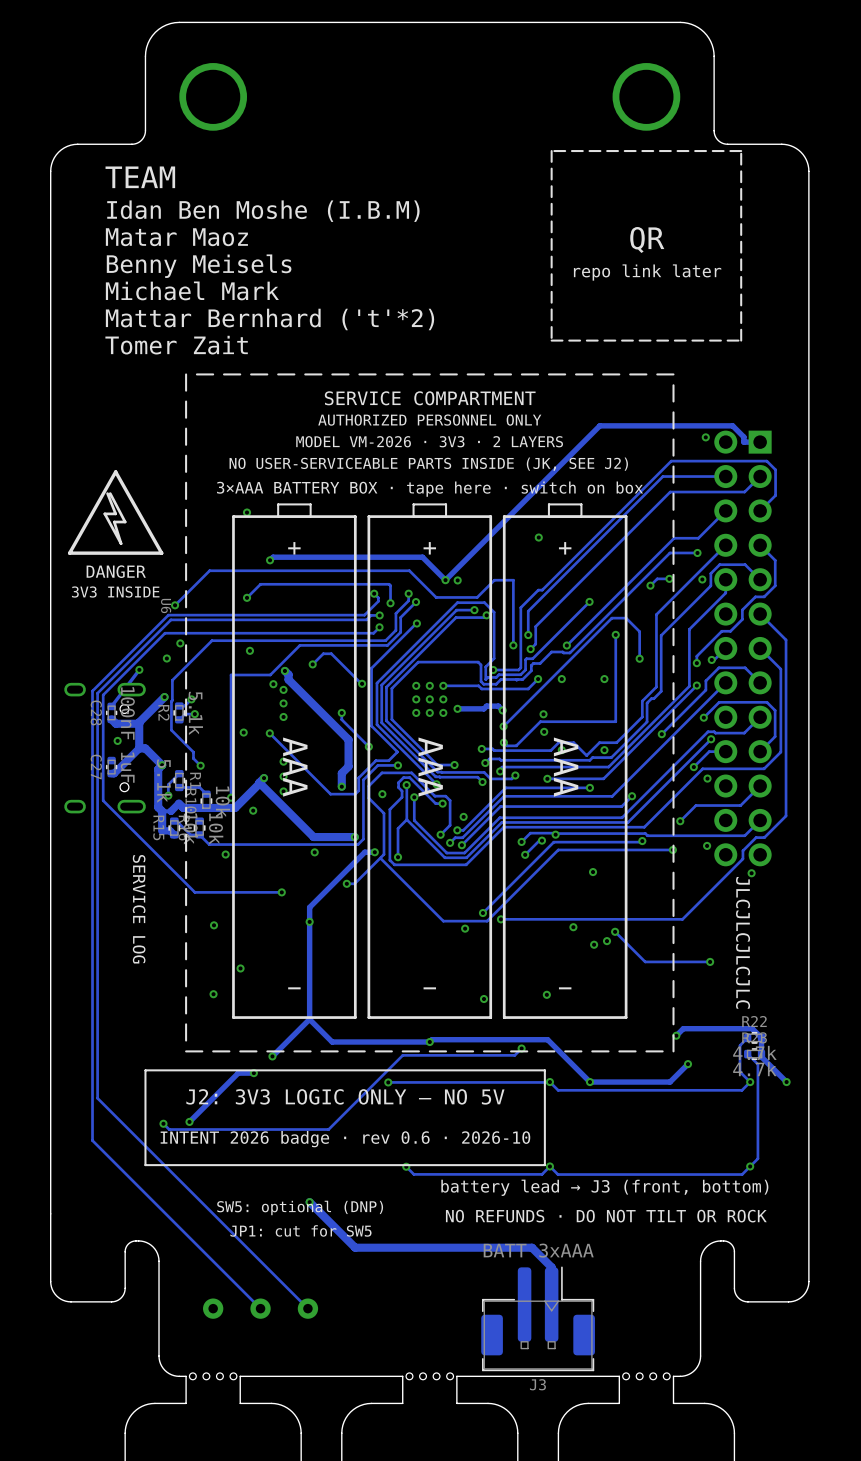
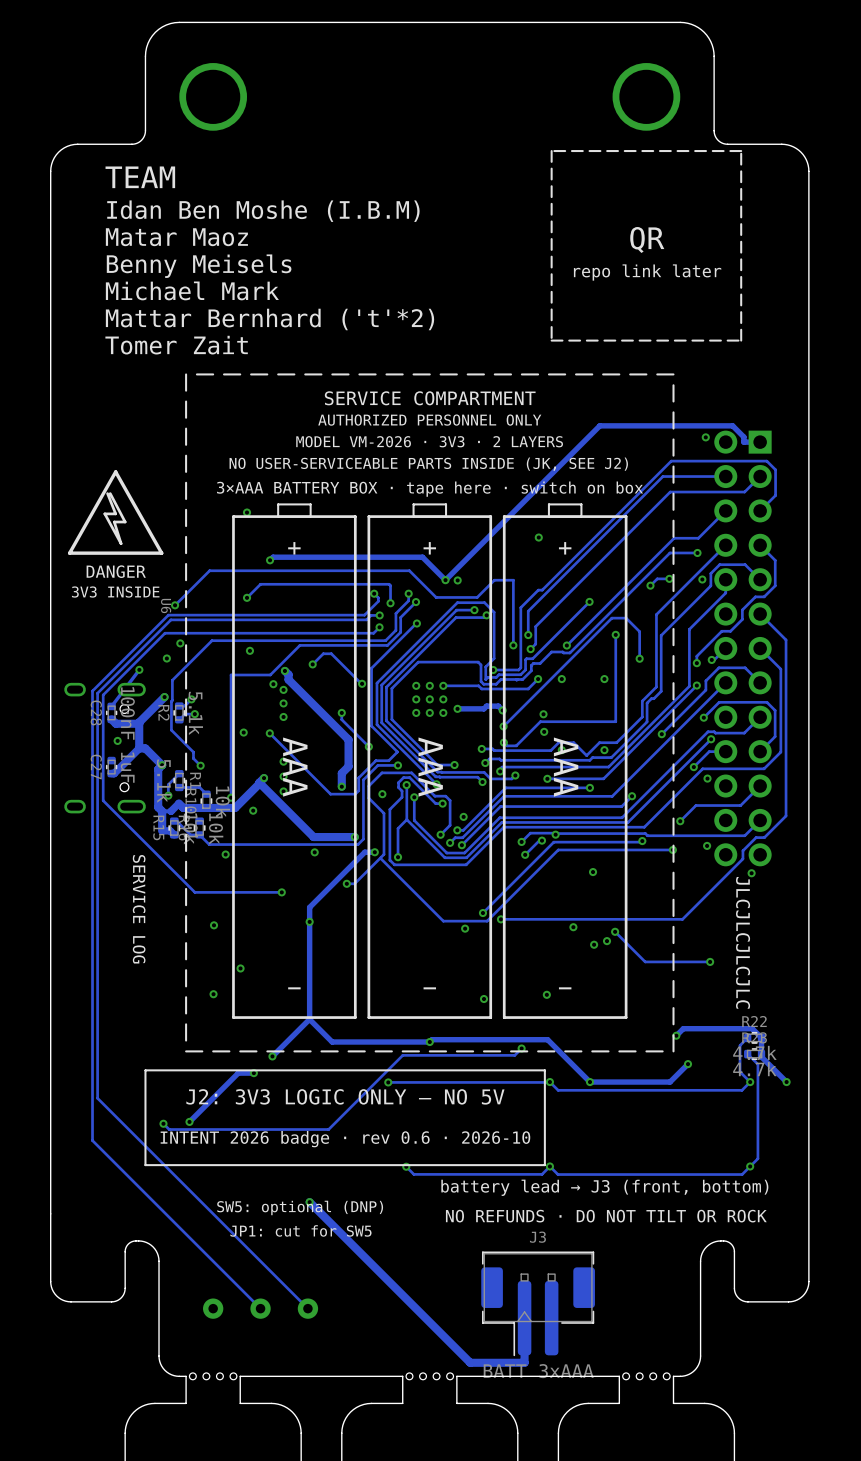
track: (355, 1247) (532, 1247) (551, 1267) (551, 1304) -> (355, 1247) (470, 1362) (524, 1362) (524, 1318)
J3 rotation: 0° (538, 1318) -> 180° (538, 1303)

